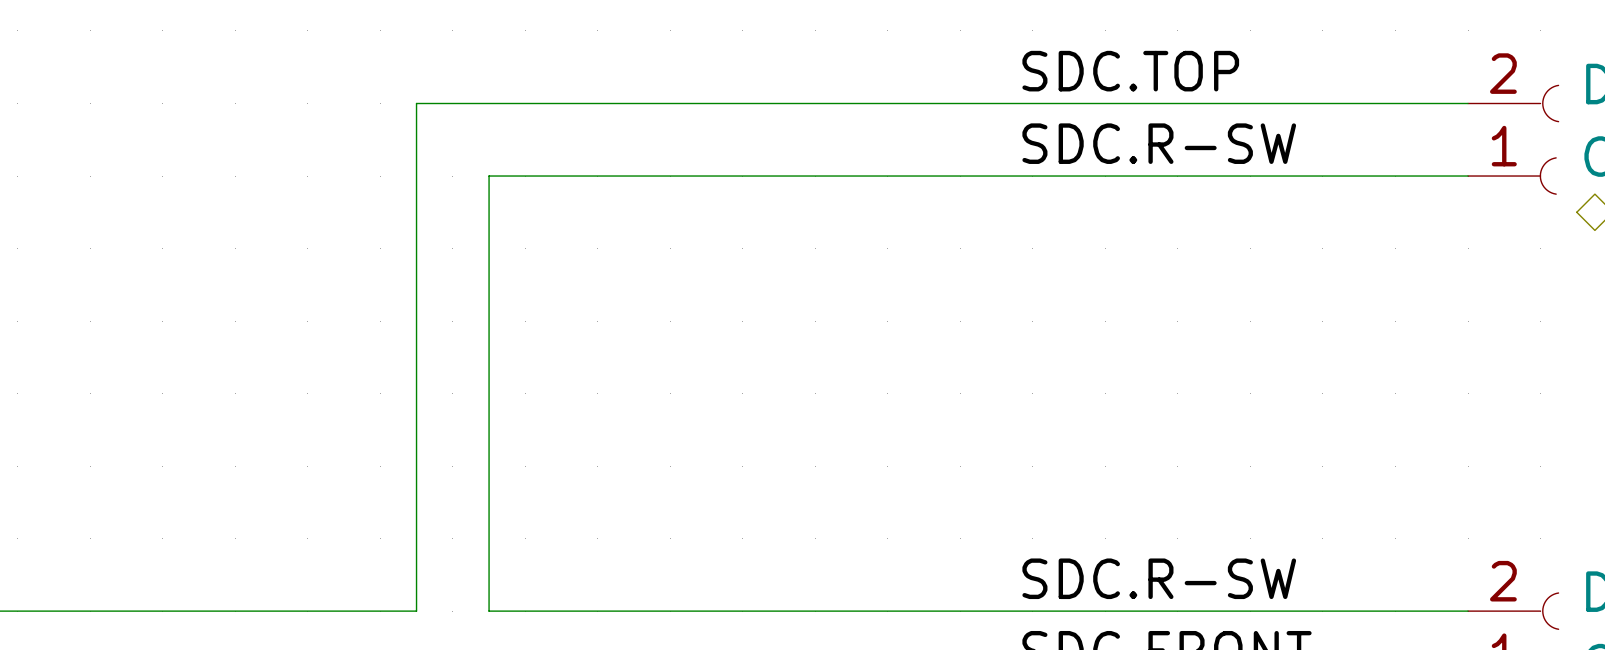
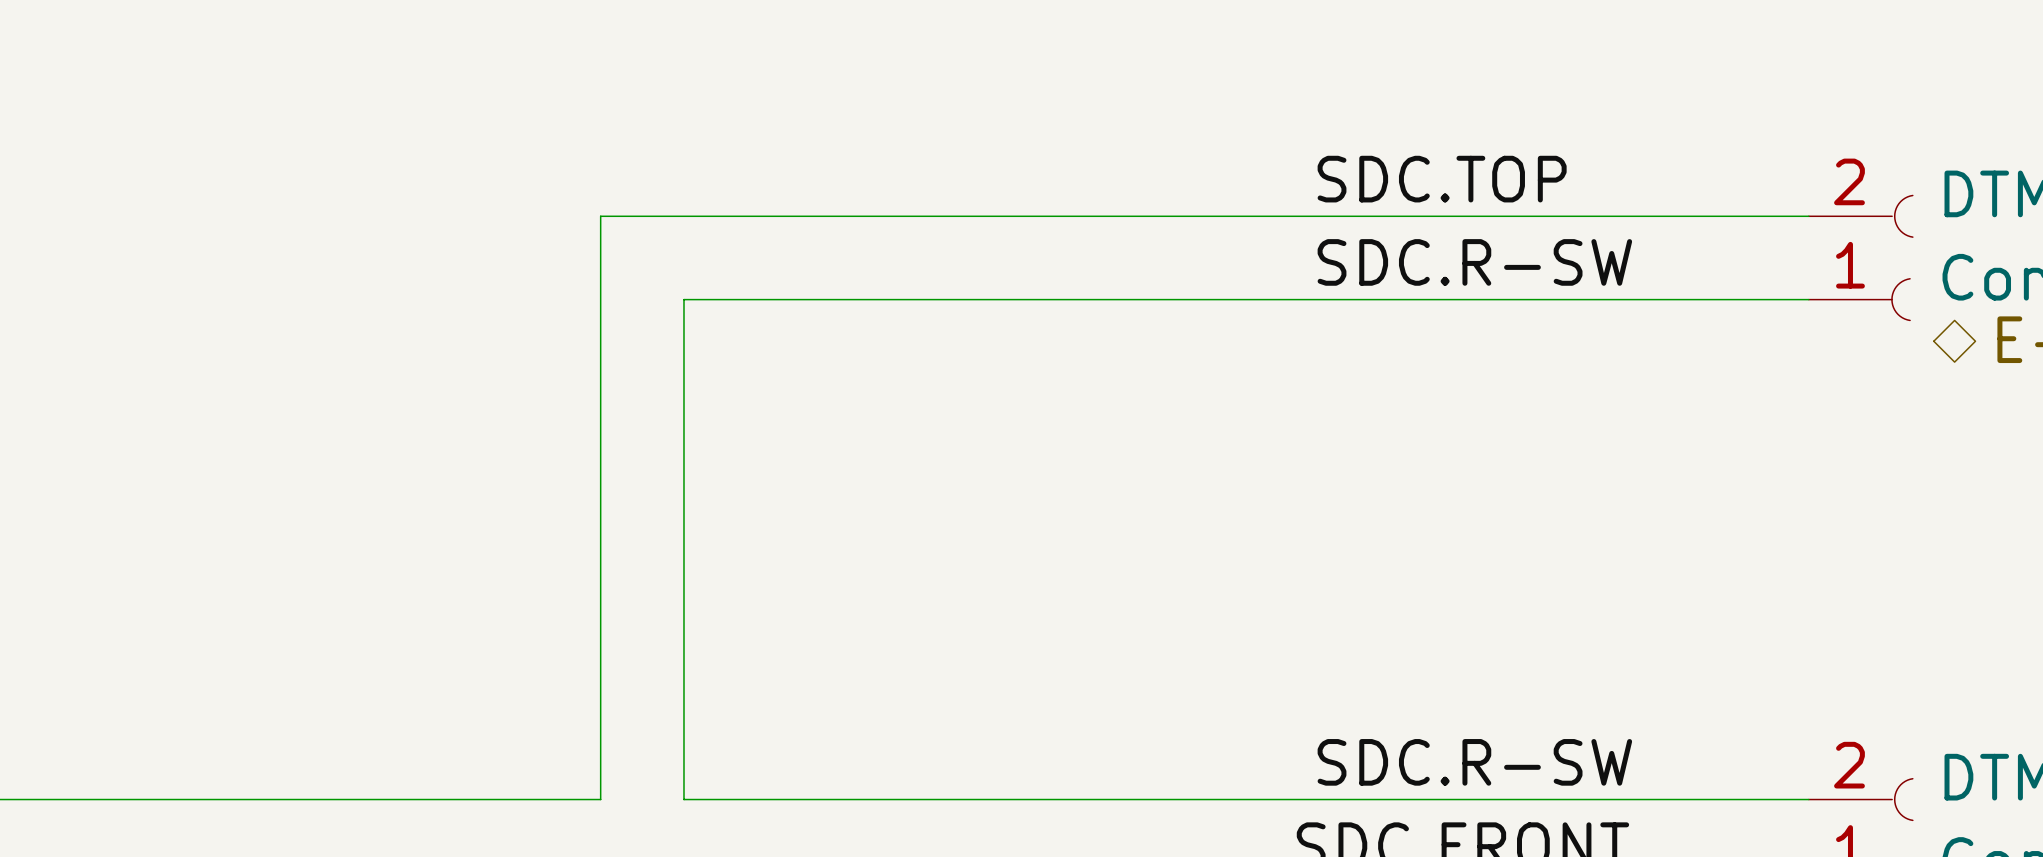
label position: SDC.TOP (1130, 71) -> SDC.TOP (1442, 179)
label position: SDC.R-SW (1159, 143) -> SDC.R-SW (1474, 262)
label position: SDC.R-SW (1159, 578) -> SDC.R-SW (1474, 762)

